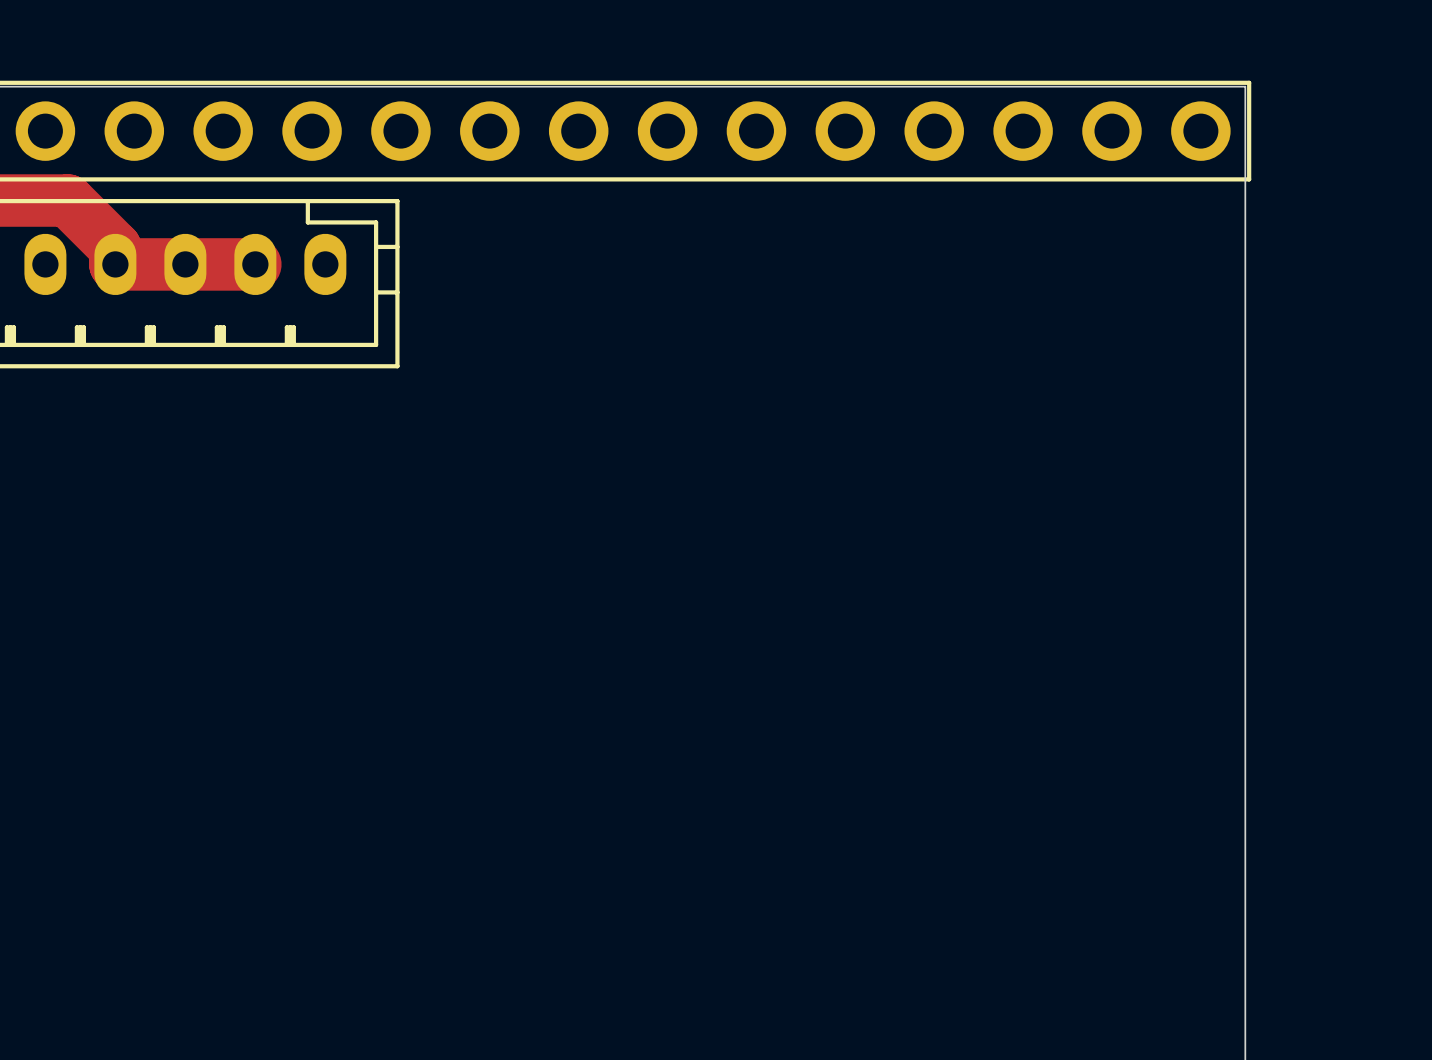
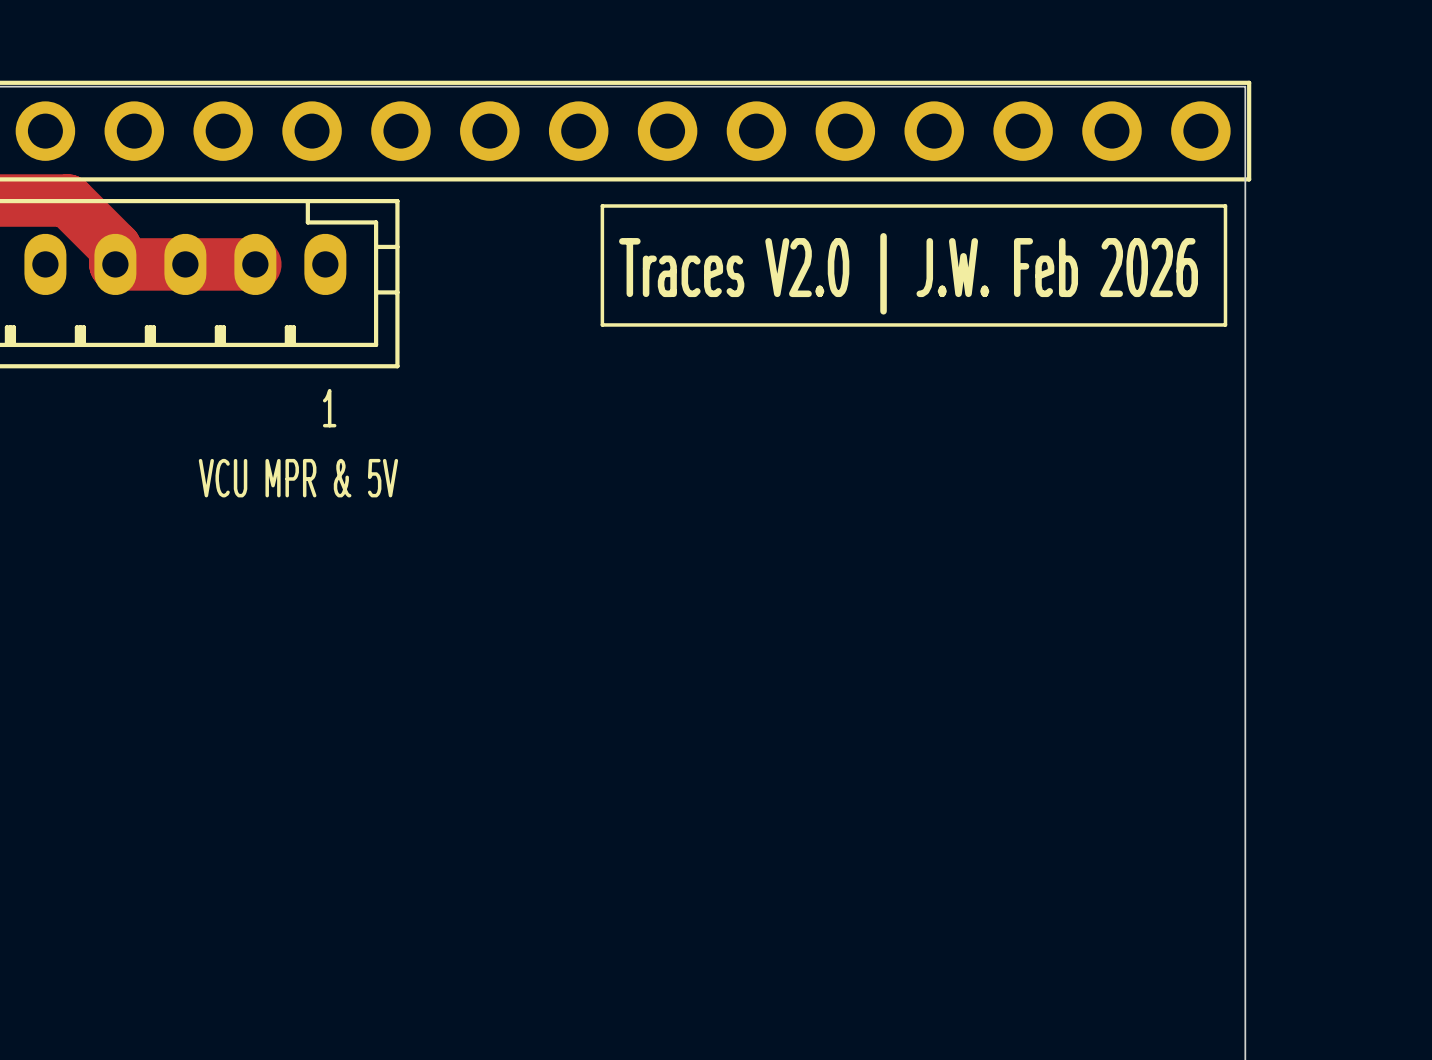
line: none -> (602, 205) (1225, 205) (1225, 324) (602, 324) (602, 205)
text: none -> Traces V2.0 | J.W. Feb 2026 (908, 273)
text: none -> 1 (329, 408)
text: none -> VCU MPR & 5V (298, 478)

